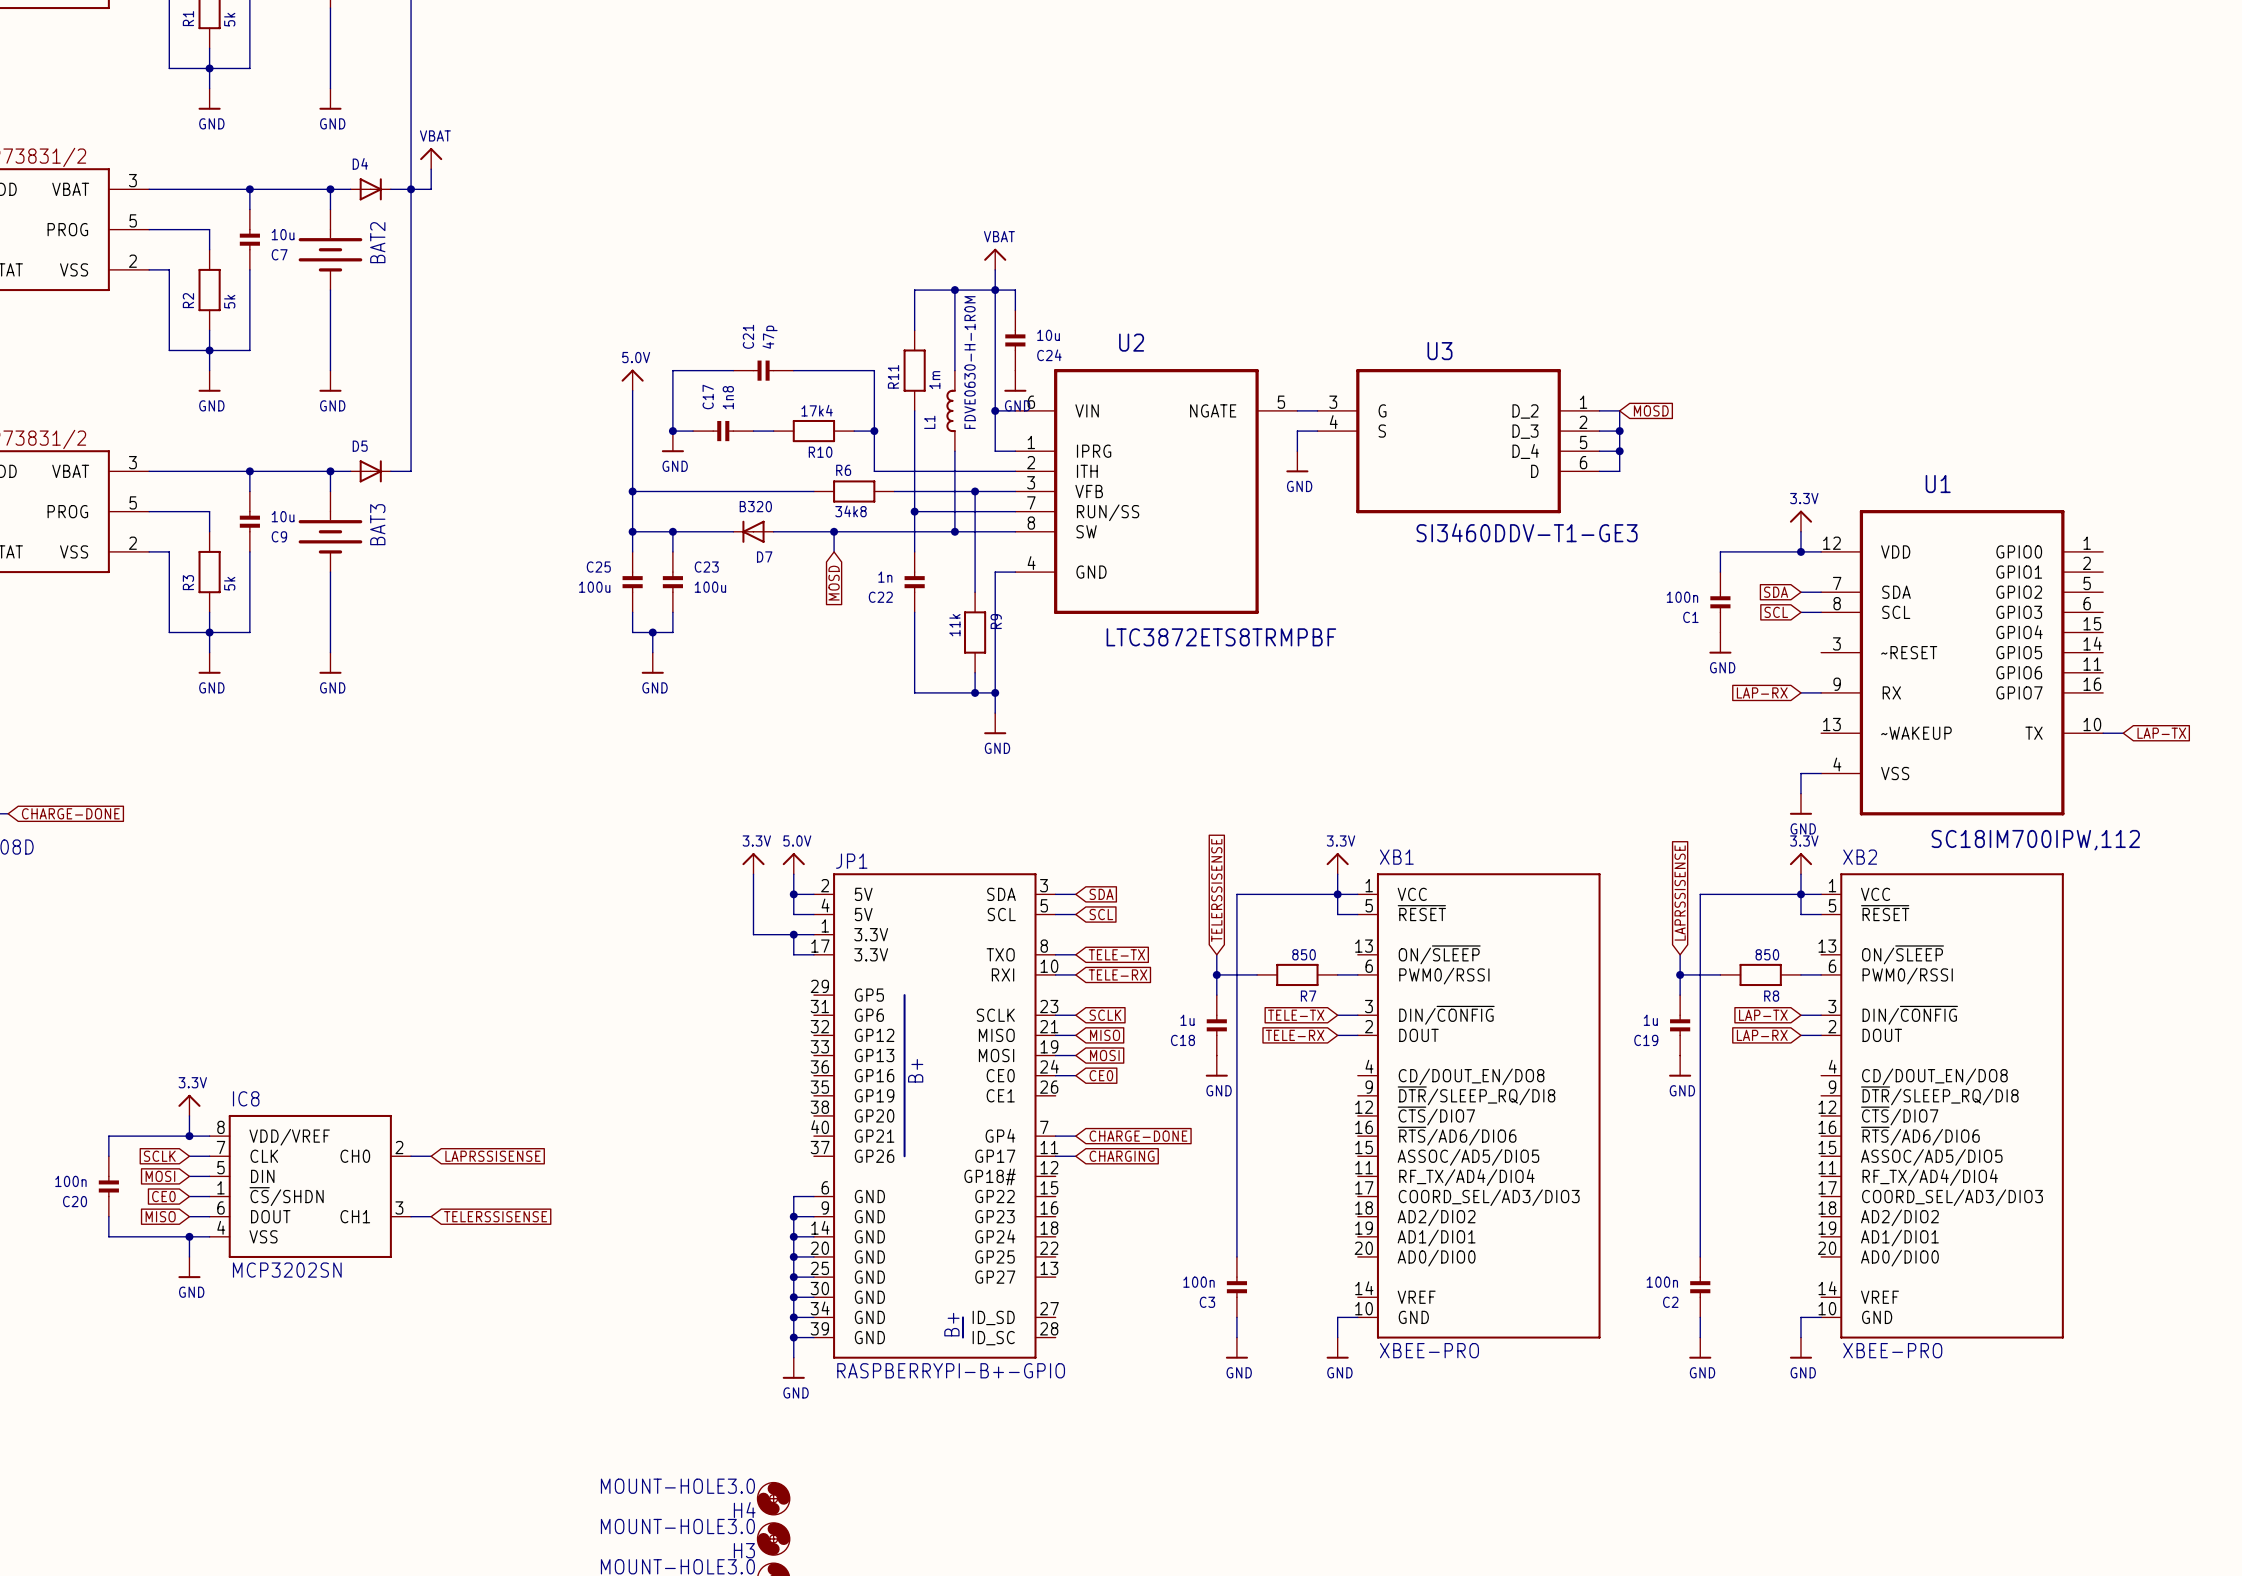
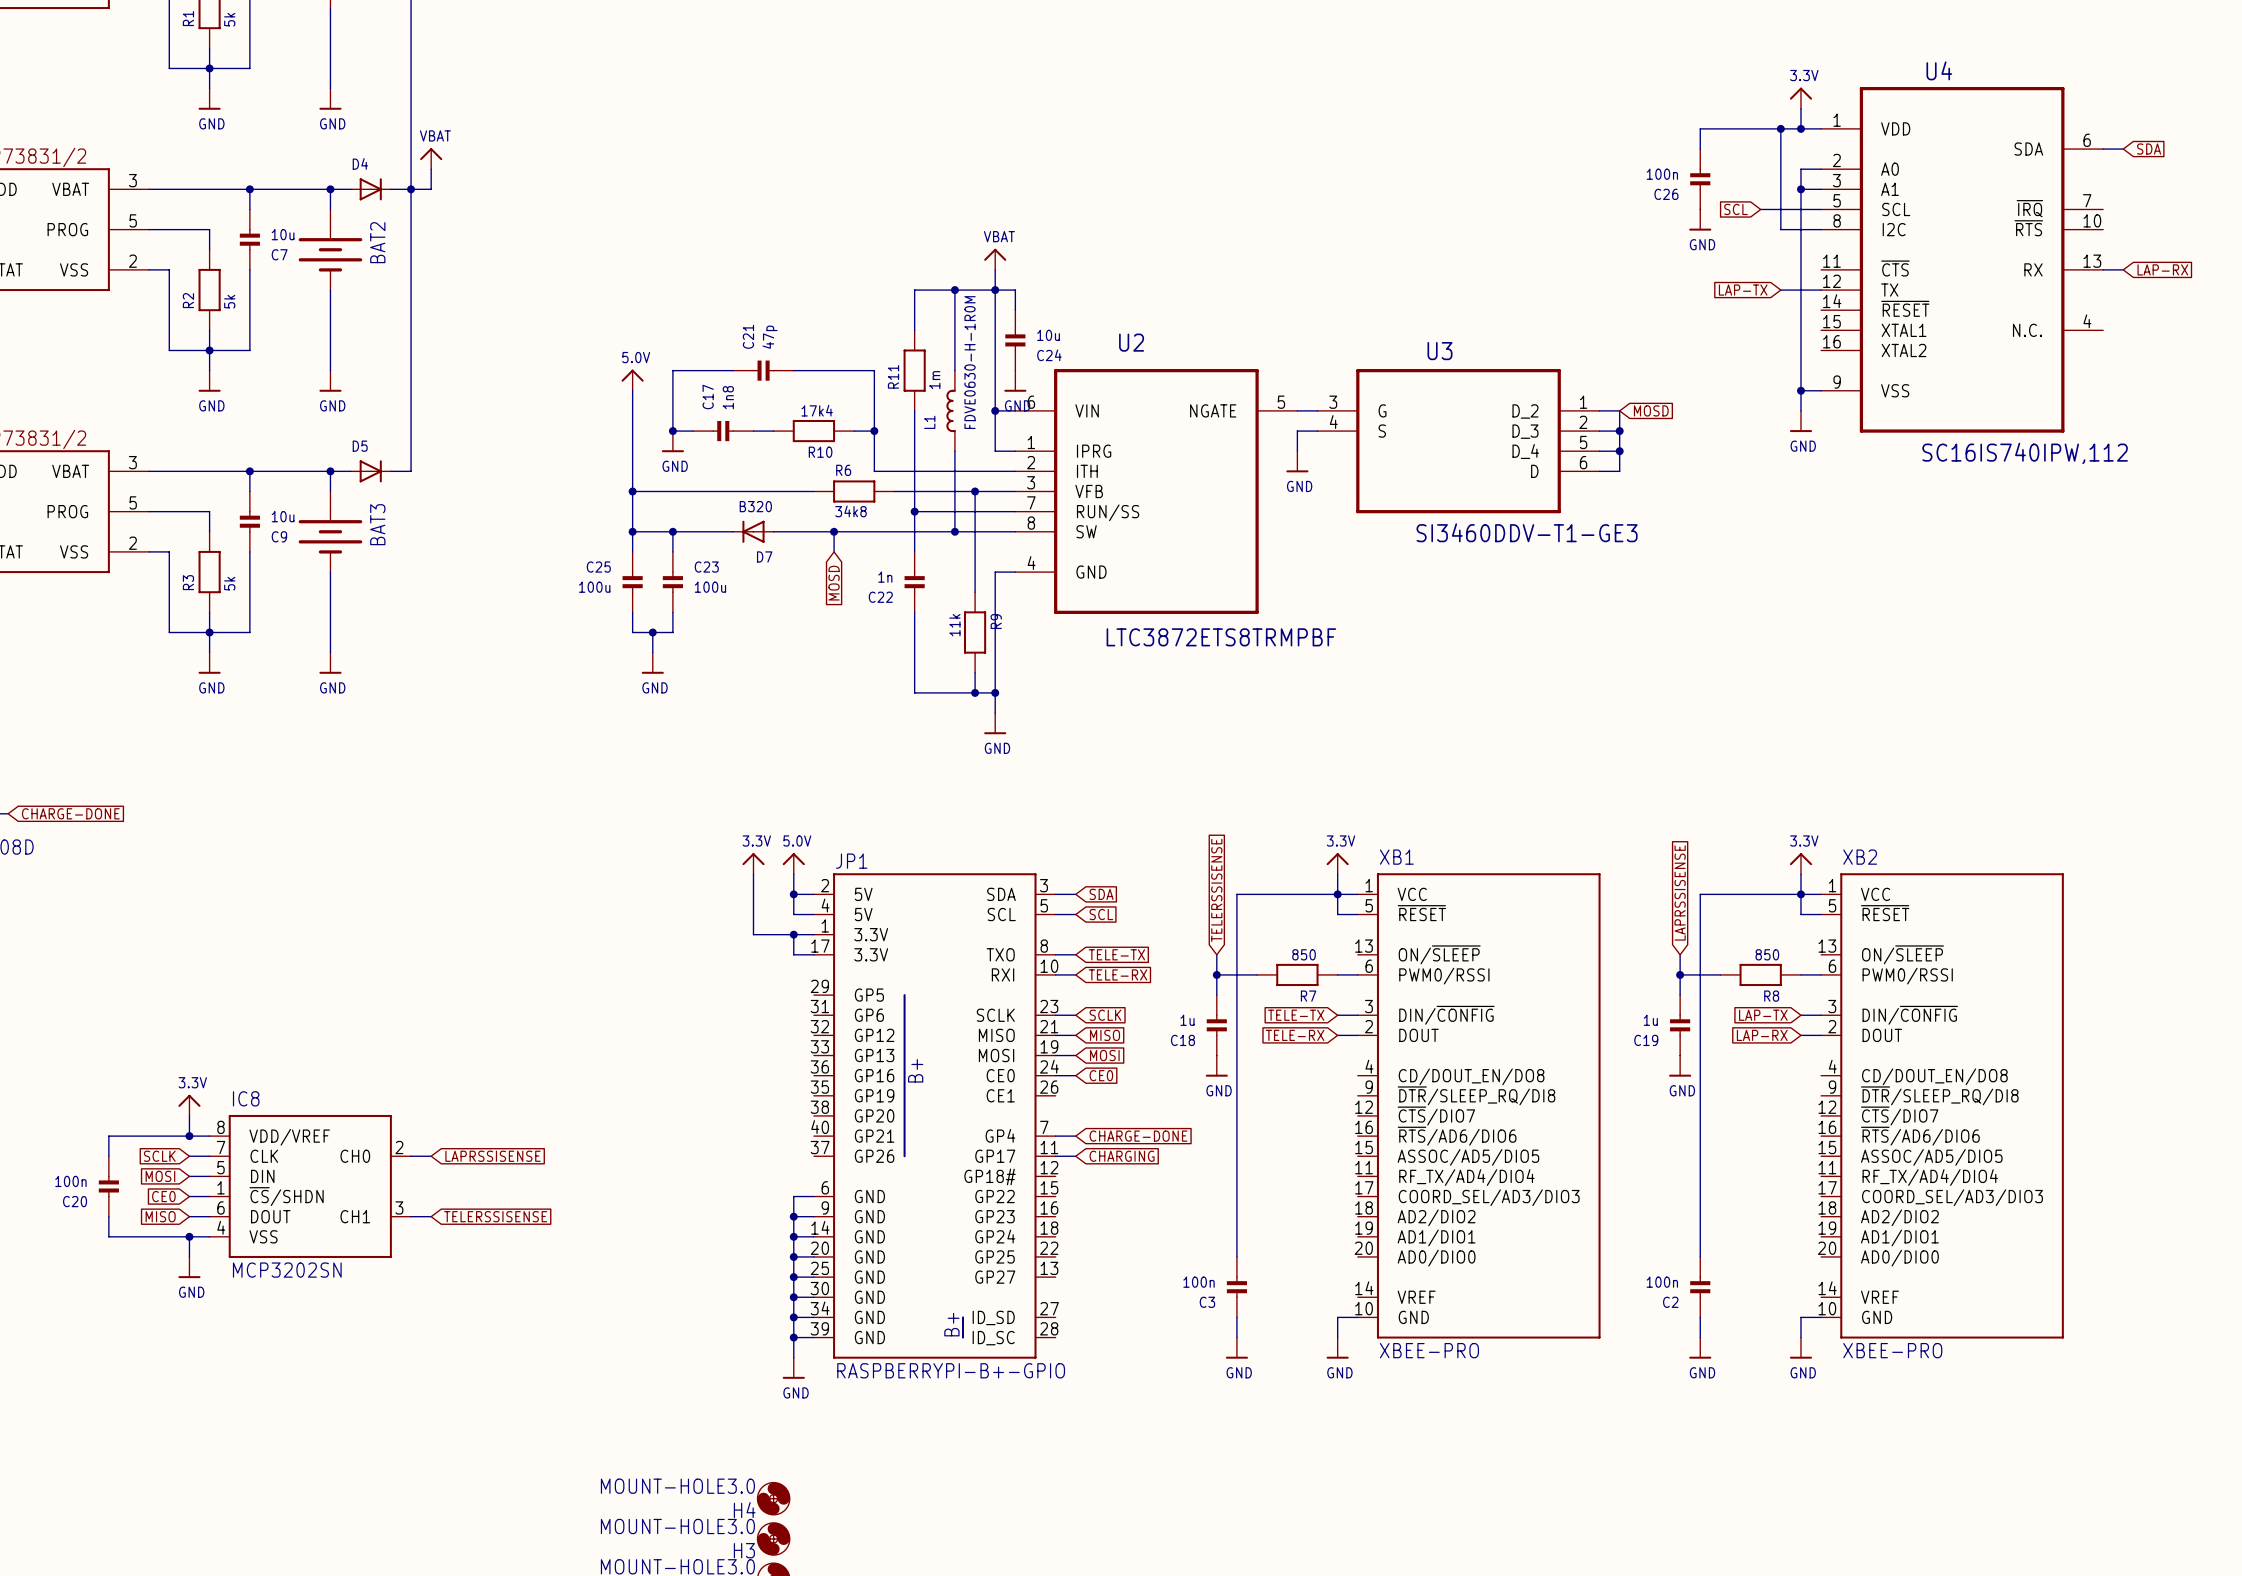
power symbol: none -> 3.3V (1800, 98)
wire: none -> (1800, 108) (1800, 128)
wire: none -> (1780, 128) (1780, 229) (1821, 229)
junction: none -> (1780, 128)
junction: none -> (1800, 128)
wire: none -> (1821, 128) (1700, 128) (1700, 149)
wire: none -> (2103, 149) (2123, 149)
global label: none -> SDA (2149, 149)
wire: none -> (1821, 169) (1800, 169) (1800, 410)
C26: none -> 100n (1700, 179)
wire: none -> (1800, 189) (1821, 189)
junction: none -> (1800, 189)
global label: none -> SCL (1735, 209)
wire: none -> (1760, 209) (1821, 209)
power symbol: none -> GND (1700, 220)
U4: none -> SC16IS740IPW,112 (1962, 259)
wire: none -> (2103, 269) (2123, 269)
global label: none -> LAP-RX (2162, 269)
global label: none -> LAP-TX (1743, 290)
wire: none -> (1780, 290) (1821, 290)
wire: none -> (1800, 390) (1821, 390)
junction: none -> (1800, 390)
power symbol: none -> GND (1800, 421)
power symbol: 3.3V (1800, 521) -> none
wire: (1800, 531) (1800, 551) -> none
junction: (1800, 551) -> none
wire: (1821, 551) (1720, 551) (1720, 572) -> none
global label: SDA (1776, 592) -> none
wire: (1800, 592) (1821, 592) -> none
C1: 100n (1720, 602) -> none
global label: SCL (1776, 612) -> none
wire: (1800, 612) (1821, 612) -> none
power symbol: GND (1720, 643) -> none
U1: SC18IM700IPW,112 (1962, 662) -> none
global label: LAP-RX (1762, 692) -> none
wire: (1800, 692) (1821, 692) -> none
wire: (2103, 733) (2123, 733) -> none
global label: LAP-TX (2161, 733) -> none
wire: (1821, 773) (1800, 773) (1800, 793) -> none
power symbol: GND (1800, 804) -> none

